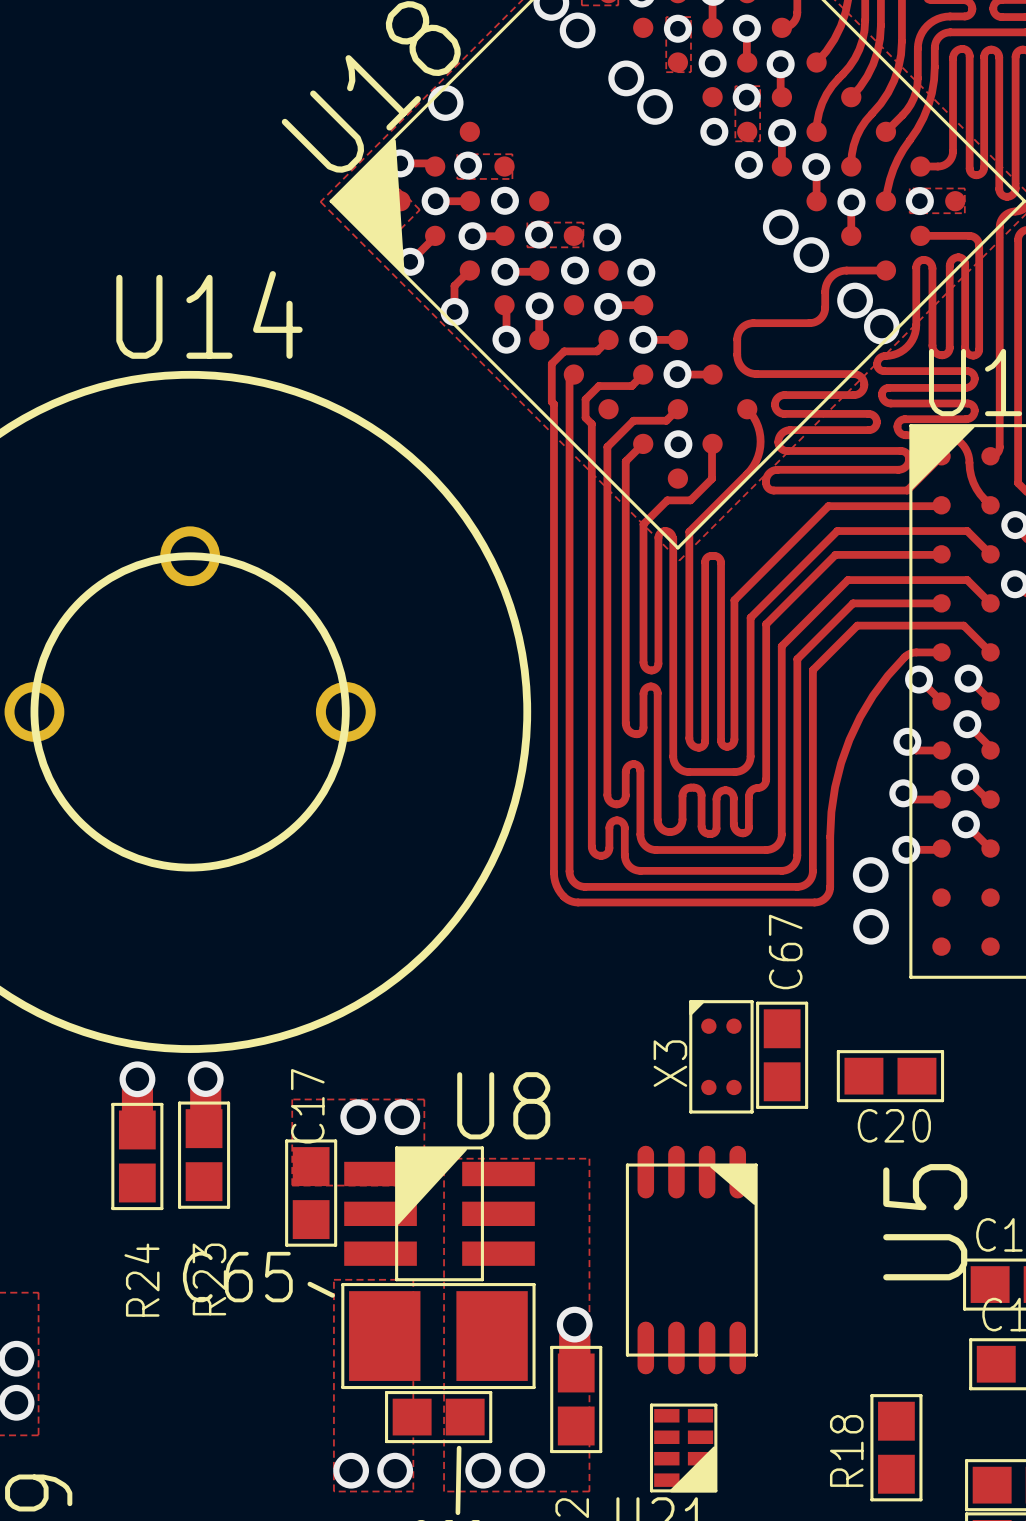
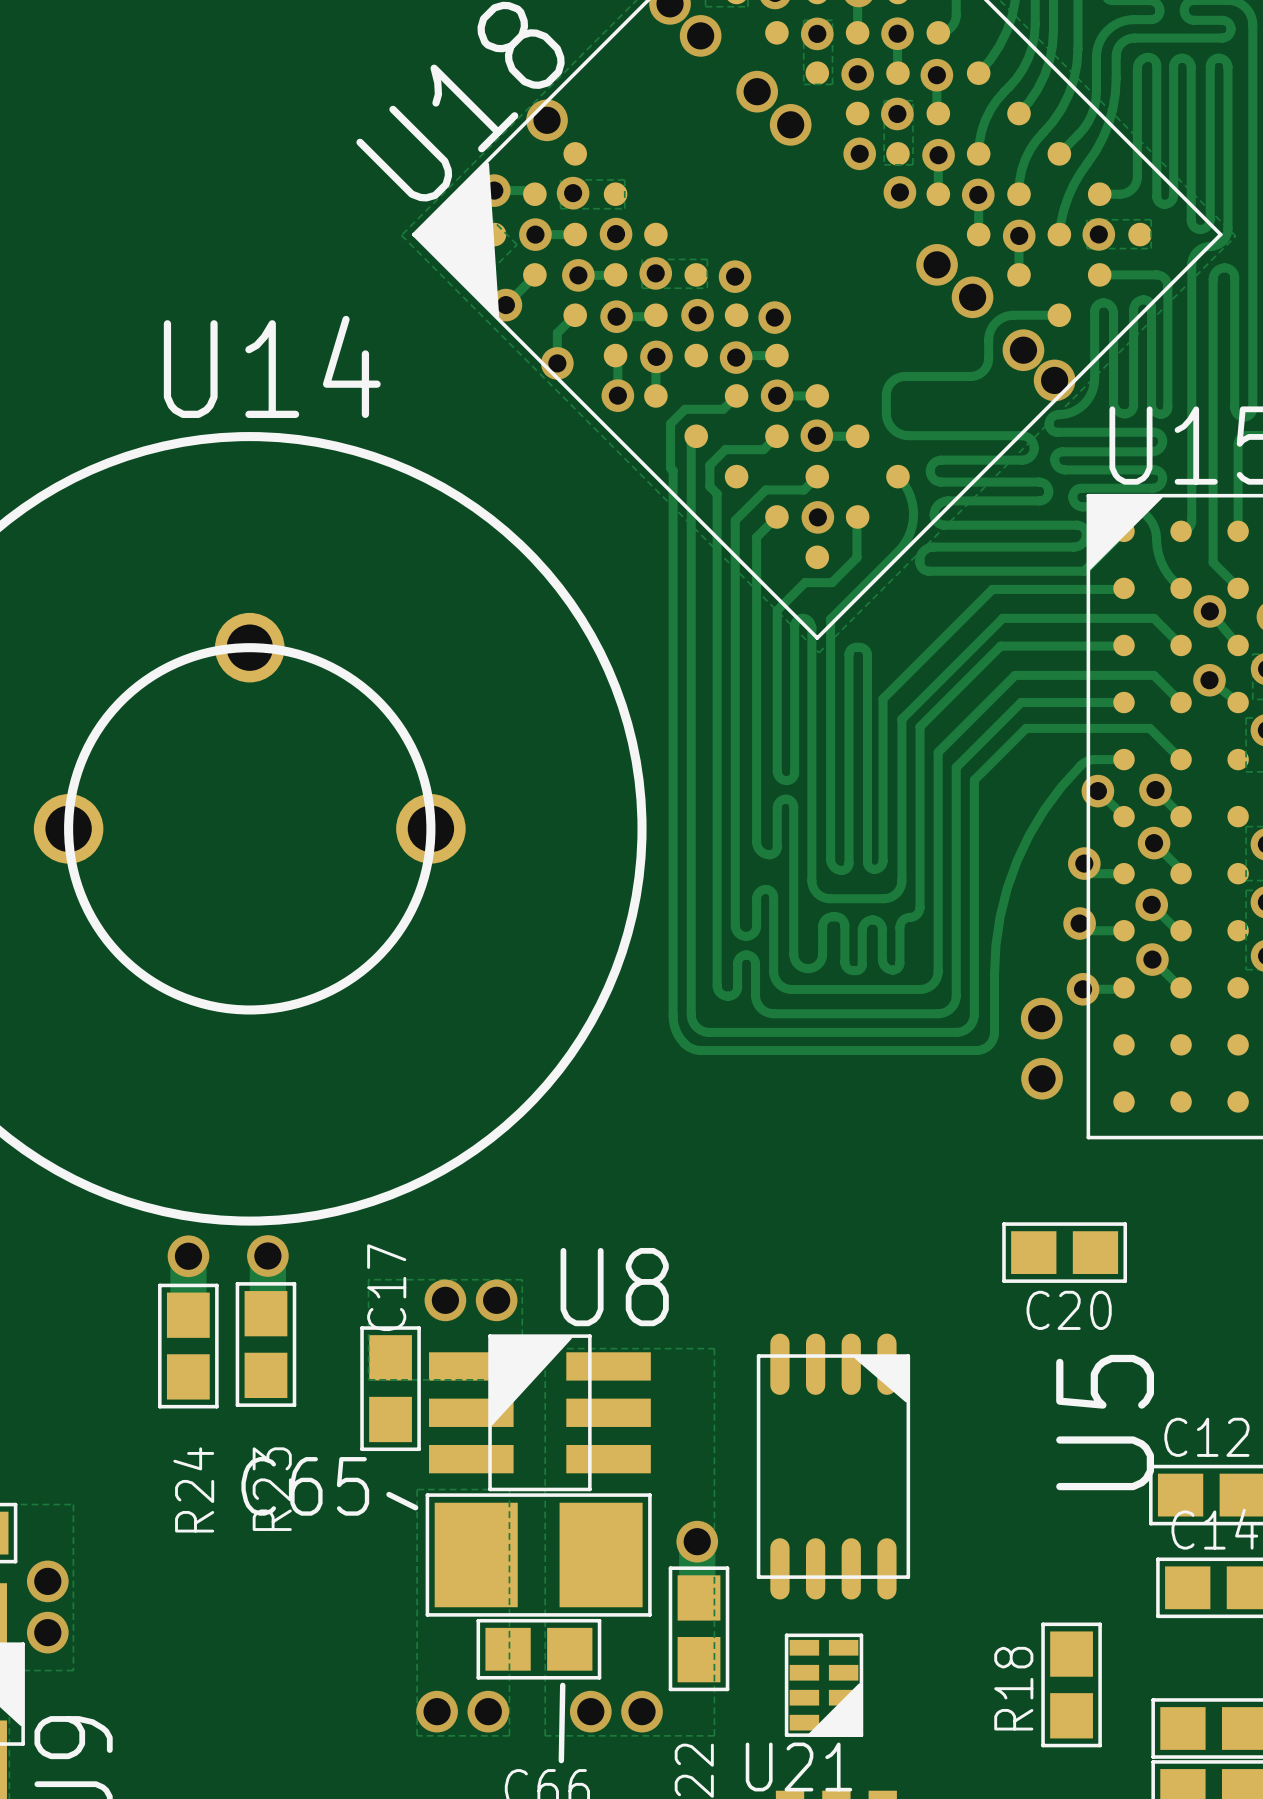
C67: (782, 1055) -> none
X3: (721, 1056) -> none

